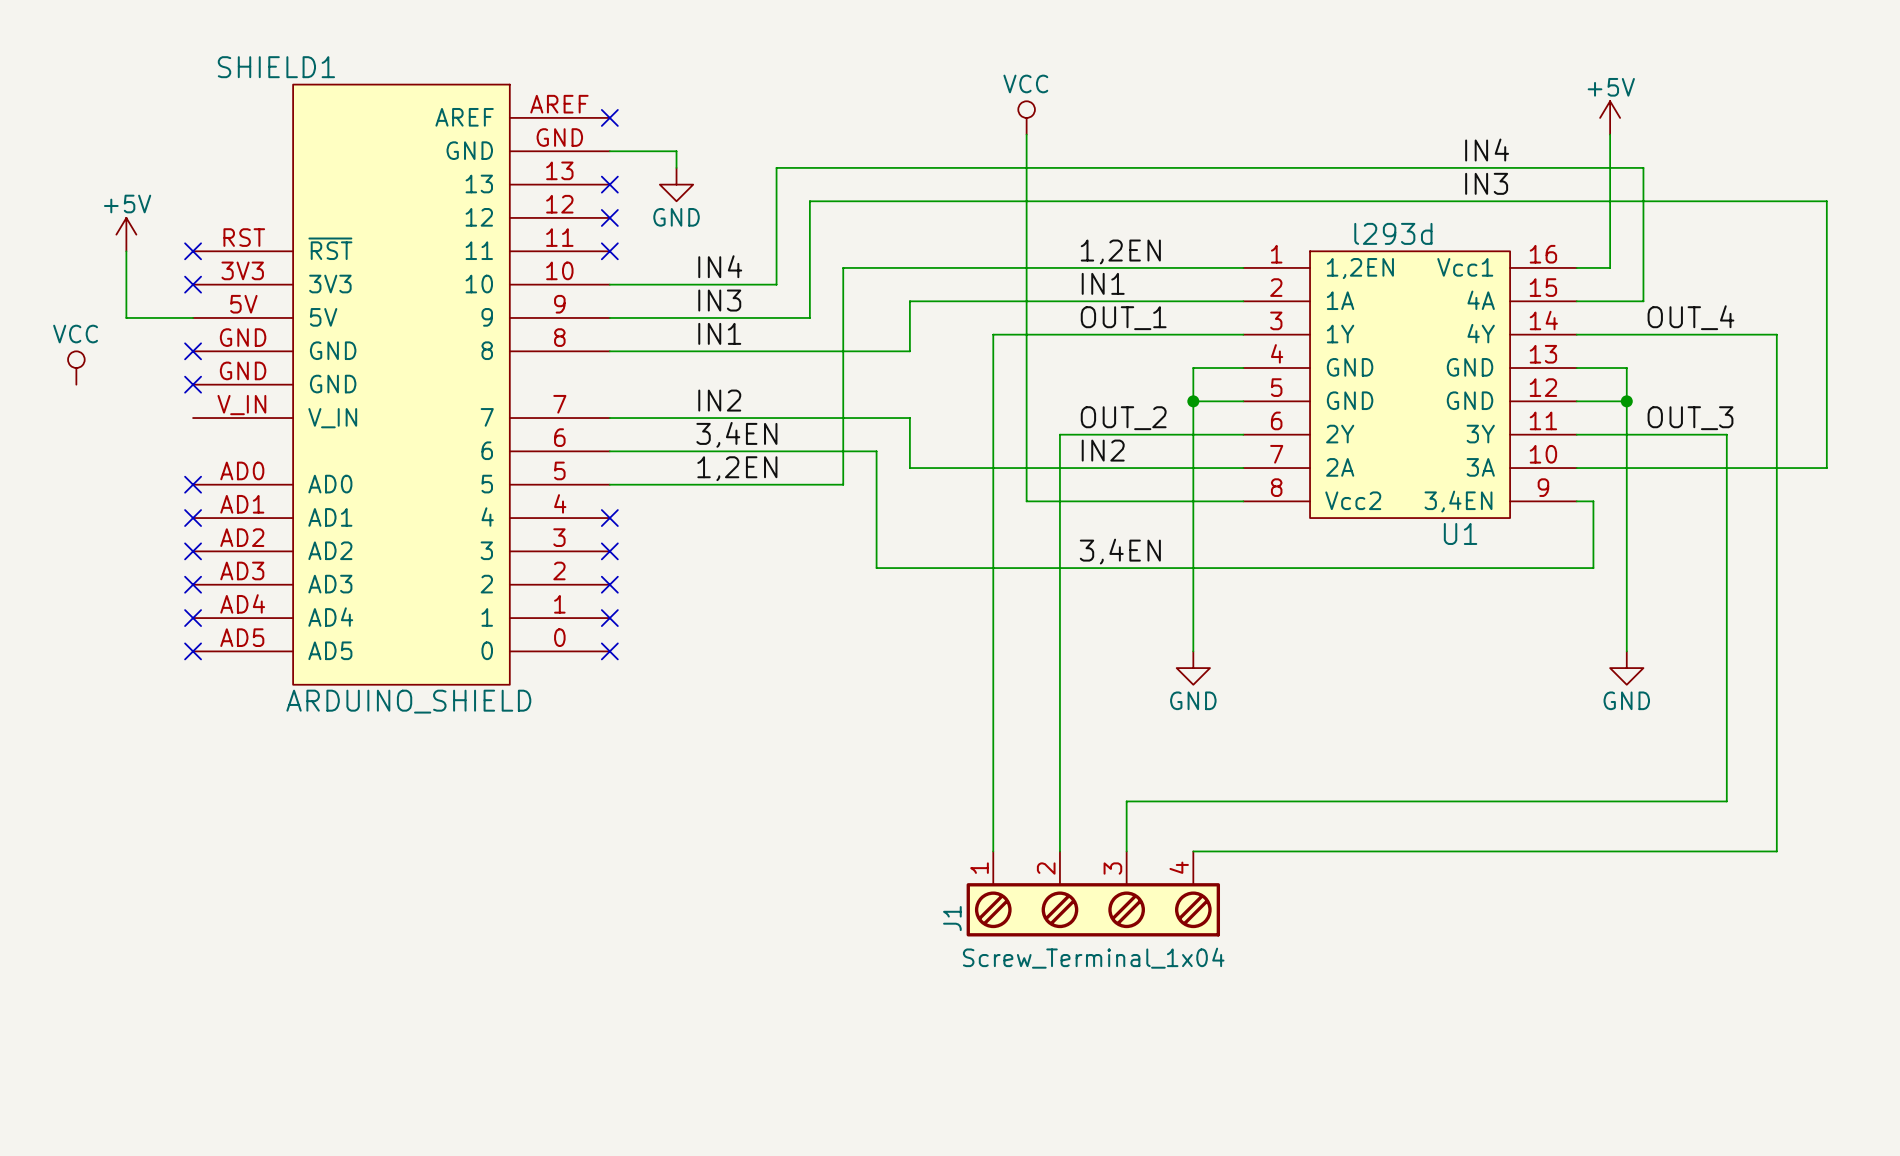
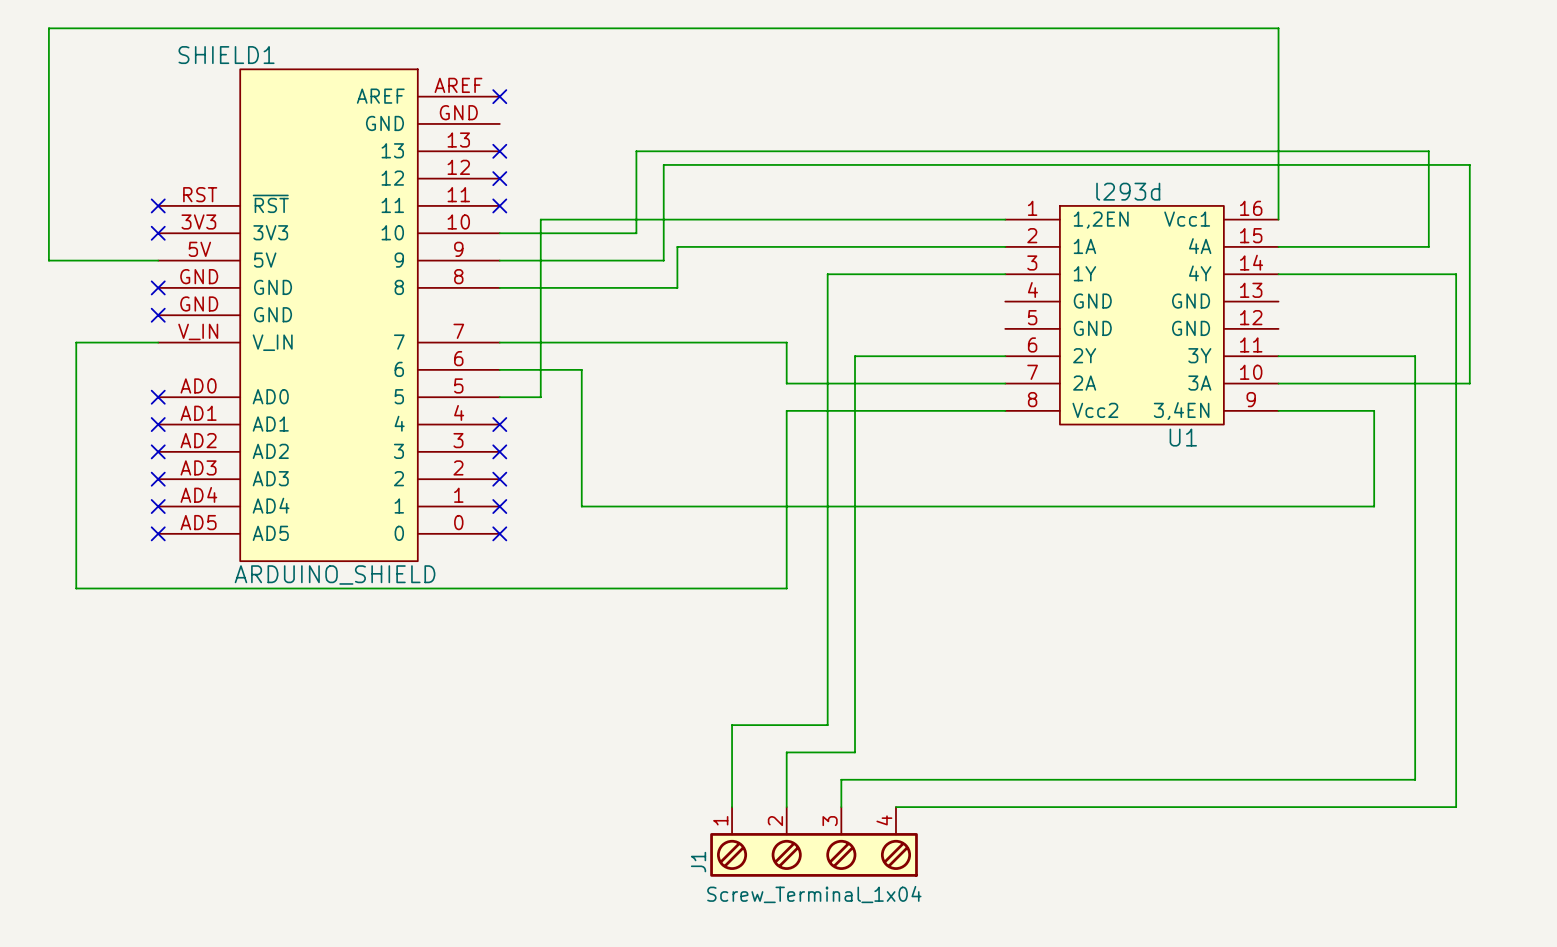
power symbol: VCC (1026, 117) -> none
power symbol: +5V (1610, 117) -> none
wire: (1026, 134) (1026, 501) -> (158, 342) (76, 342) (76, 588) (786, 588) (786, 410) (841, 410)
wire: (1610, 134) (1610, 267) (1576, 267) -> none
label: IN4 (1487, 150) -> none
wire: (609, 151) (676, 151) (676, 167) -> none
label: IN3 (1486, 183) -> none
power symbol: GND (676, 184) -> none
wire: (776, 184) (776, 167) (1643, 167) (1643, 301) -> (636, 151) (1428, 151) (1428, 246) (1346, 246)
wire: (1793, 201) (1826, 201) (1826, 468) (1793, 468) -> (1469, 164) (1469, 383)
power symbol: +5V (126, 234) -> none
wire: (126, 251) (126, 317) -> (1278, 219) (1278, 28) (48, 28) (48, 260) (103, 260)
label: 1,2EN (1120, 251) -> none
label: IN4 (720, 266) -> none
wire: (843, 267) (843, 484) (659, 484) -> (691, 219) (540, 219) (540, 397)
label: IN1 (1103, 283) -> none
label: IN3 (719, 300) -> none
wire: (909, 301) (909, 351) (826, 351) -> (745, 246) (677, 246) (677, 287)
label: OUT_4 (1690, 317) -> none
label: OUT_1 (1123, 318) -> none
label: IN1 (719, 333) -> none
wire: (1009, 334) (993, 334) (993, 851) -> (827, 274) (827, 725) (732, 725) (732, 807)
power symbol: VCC (76, 368) -> none
wire: (1243, 368) (1193, 368) (1193, 651) -> none
wire: (1576, 368) (1626, 368) (1626, 651) -> none
U1 position: (1410, 384) -> (1141, 315)
label: IN2 (719, 400) -> none
wire: (1193, 401) (1243, 401) -> none
junction: (1193, 401) -> none
wire: (1576, 401) (1626, 401) -> none
junction: (1626, 401) -> none
wire: (909, 418) (909, 468) (959, 468) -> (745, 342) (786, 342) (786, 383)
label: OUT_2 (1123, 418) -> none
label: OUT_3 (1690, 418) -> none
label: 3,4EN (736, 434) -> none
wire: (1059, 434) (1059, 851) -> (868, 356) (855, 356) (855, 752) (786, 752) (786, 807)
label: IN2 (1103, 450) -> none
wire: (709, 451) (876, 451) (876, 568) (1593, 568) (1593, 501) -> (581, 369) (581, 506) (1374, 506) (1374, 410) (1305, 410)
label: 1,2EN (737, 468) -> none
label: 3,4EN (1120, 551) -> none
power symbol: GND (1193, 668) -> none
power symbol: GND (1626, 668) -> none
wire: (1726, 801) (1126, 801) (1126, 851) -> (1415, 656) (1415, 779) (841, 779) (841, 807)
wire: (1193, 851) (1776, 851) -> (895, 807) (1456, 807) (1456, 697)
J1 position: (1093, 893) -> (814, 841)

